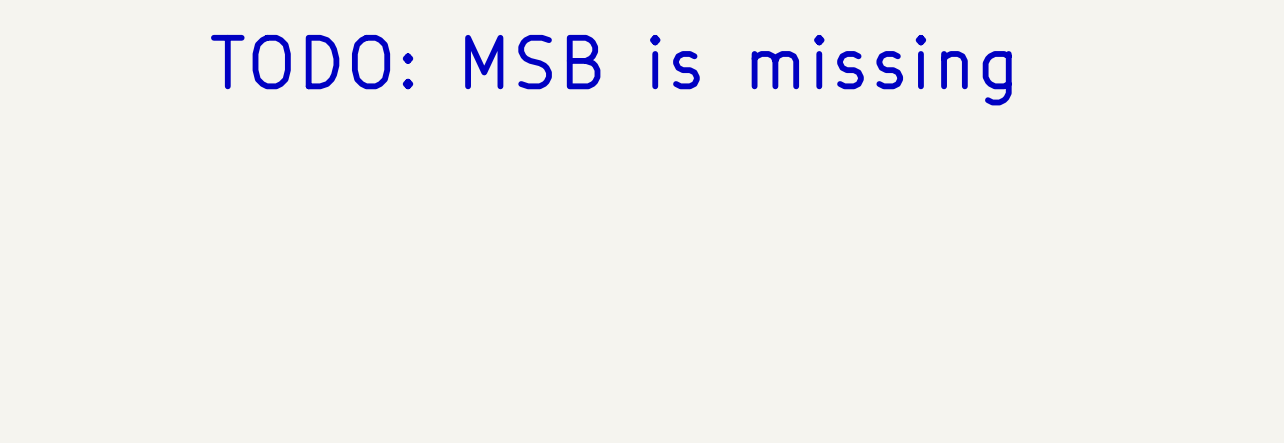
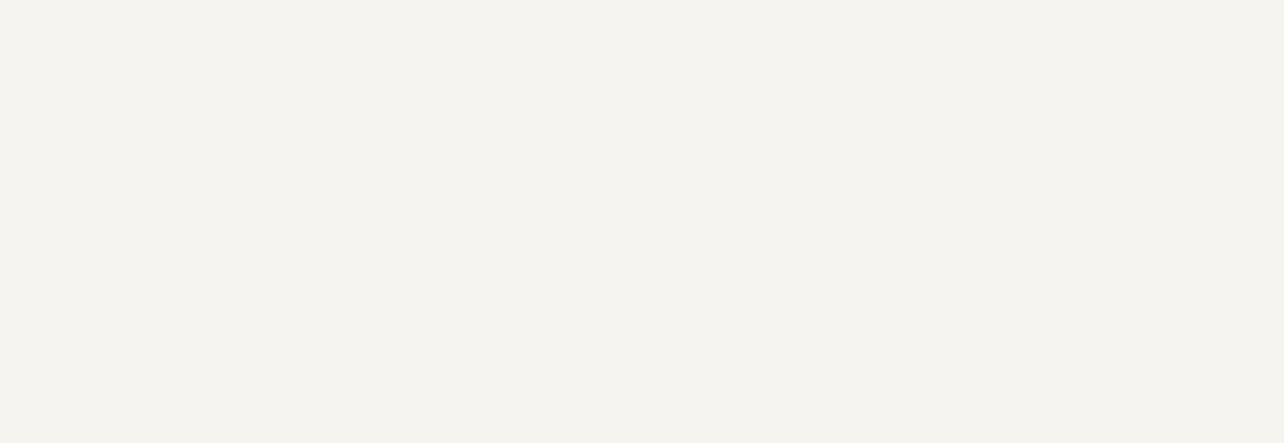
text: TODO: MSB is missing (611, 70) -> none

